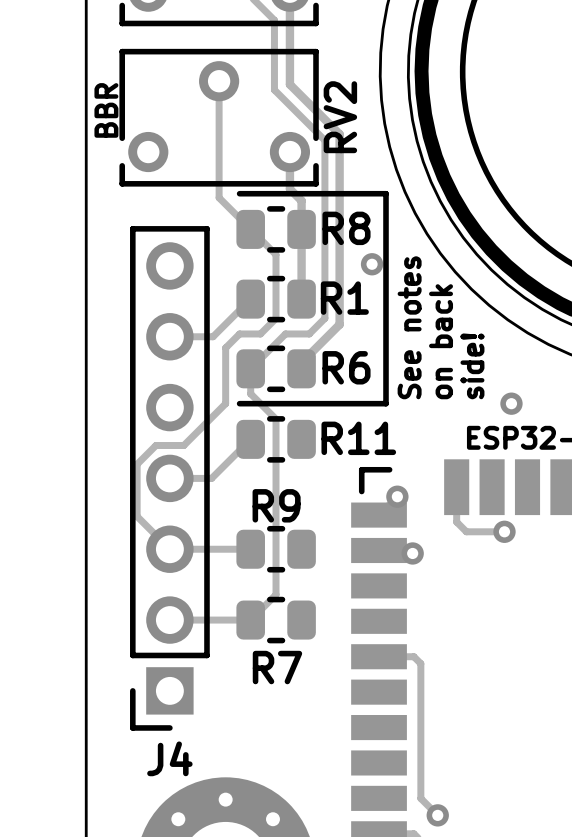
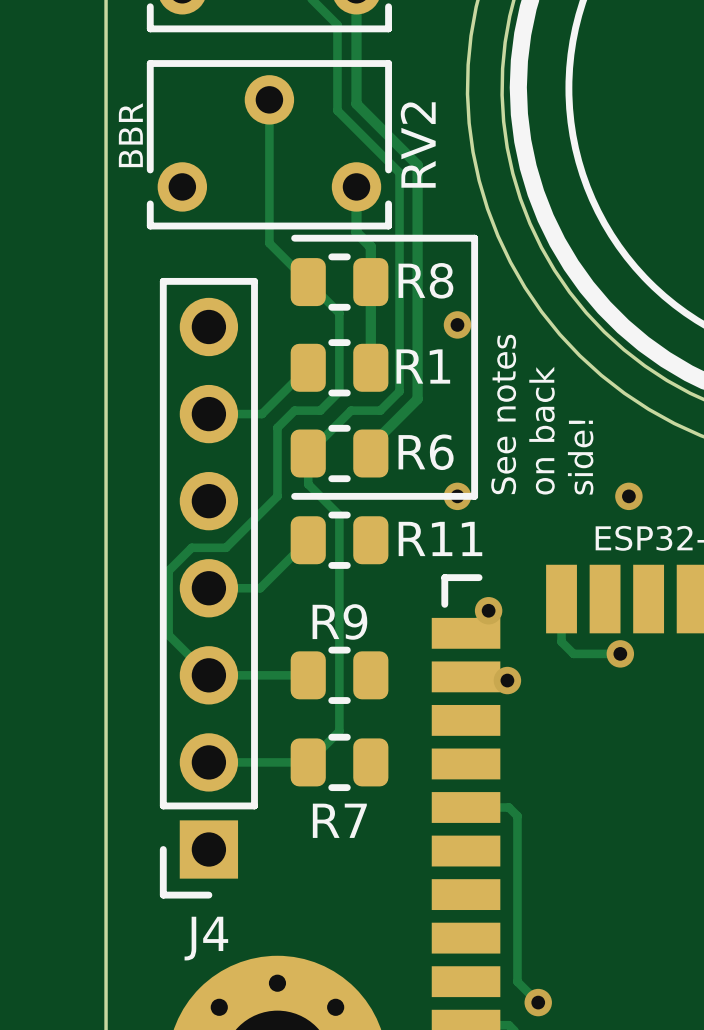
via: none -> (457, 496)

